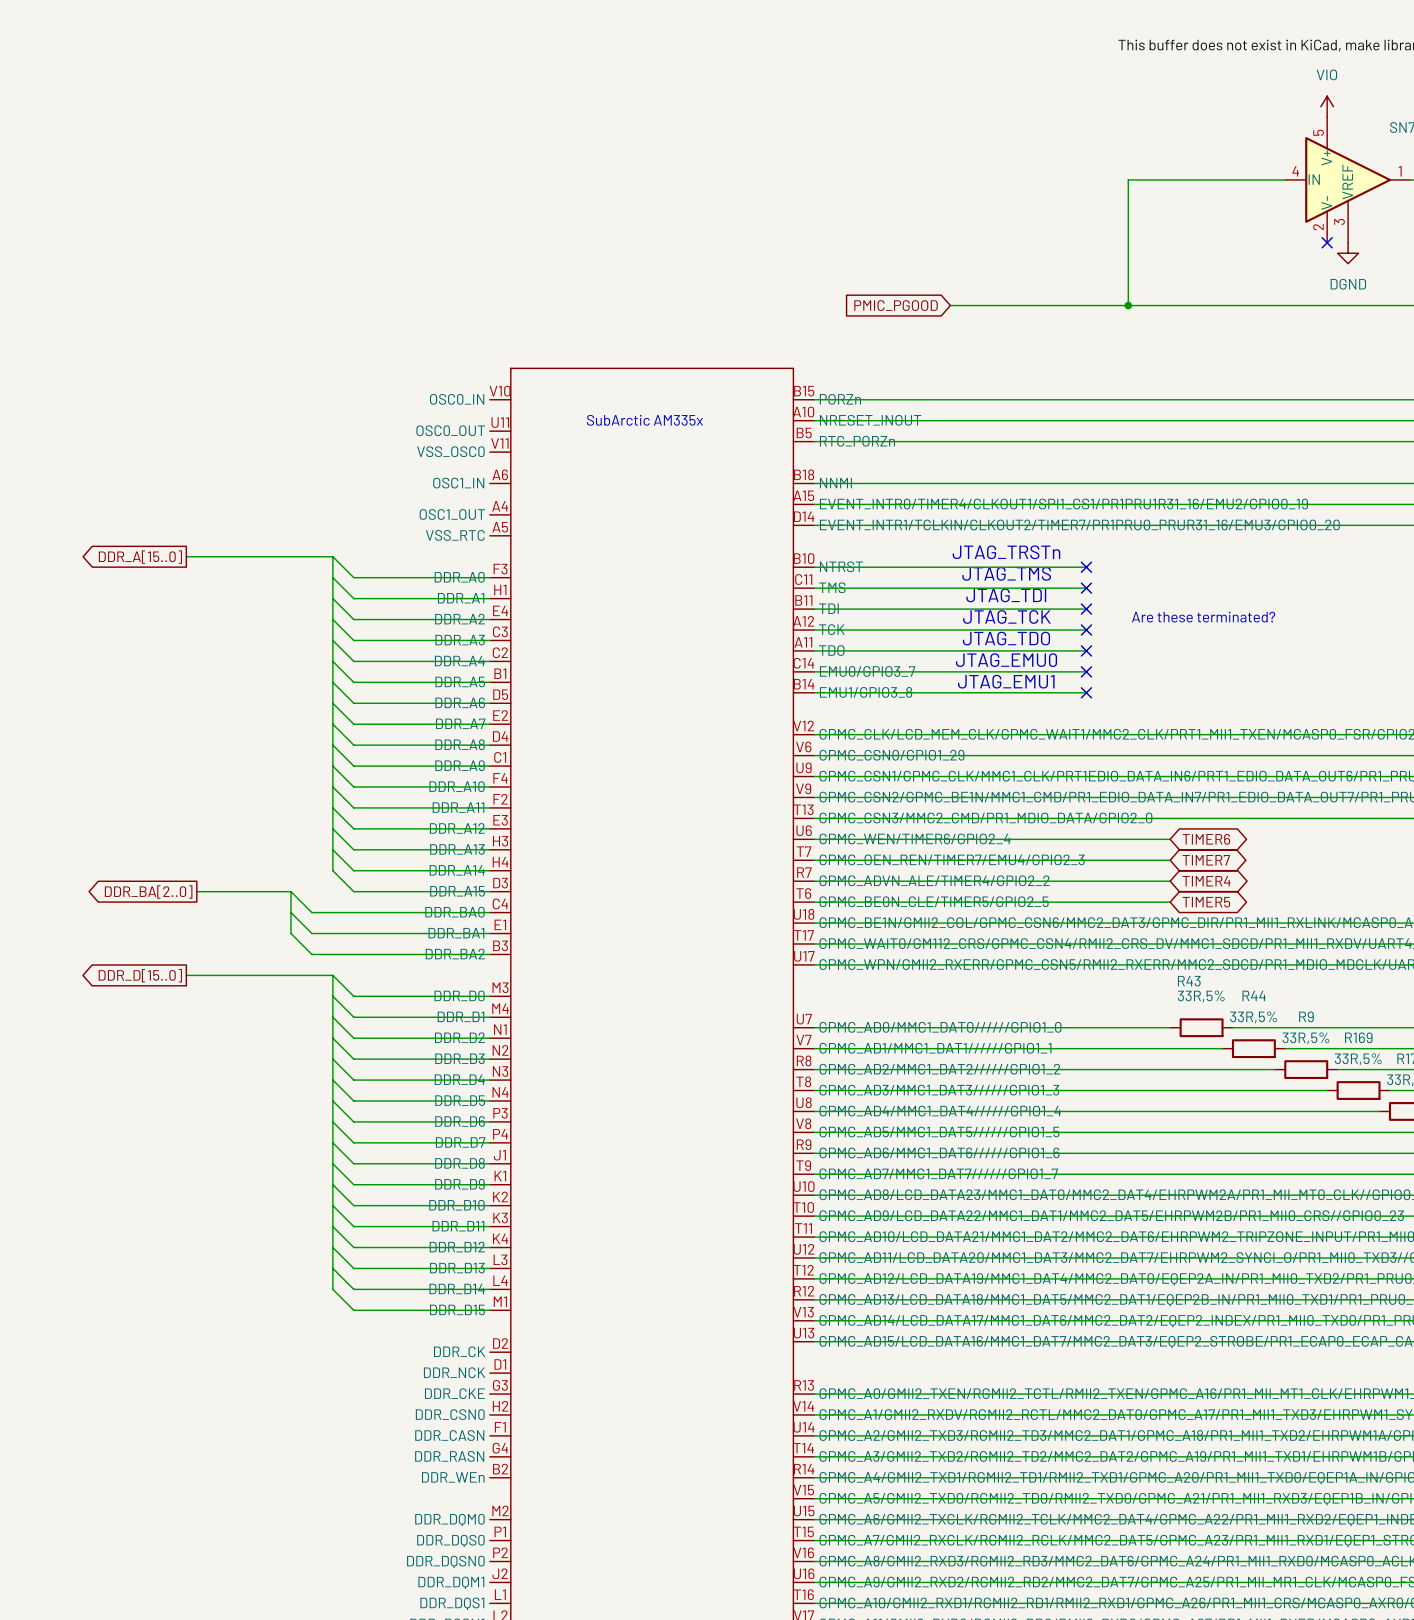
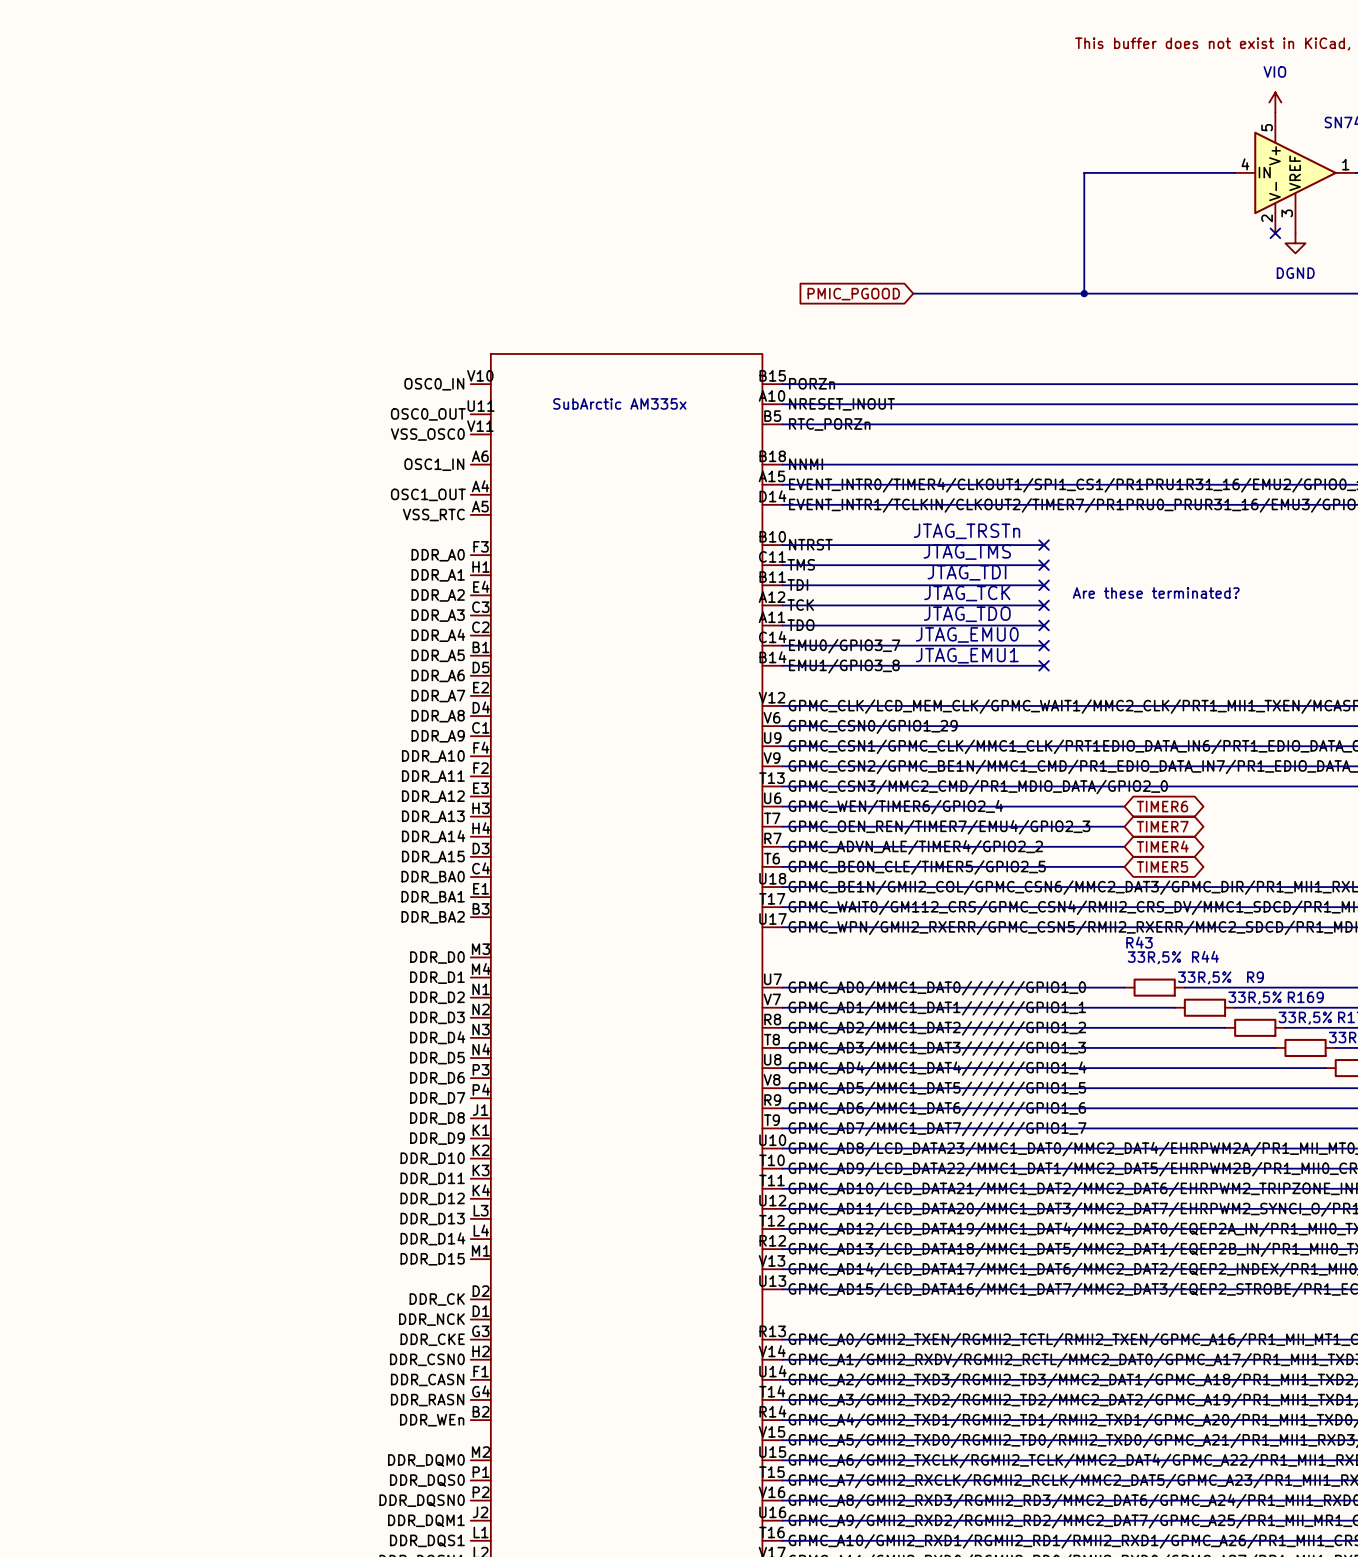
wire: (186, 556) (332, 556) -> none
wire: (332, 556) (353, 577) (489, 577) -> none
wire: (332, 556) (332, 870) (353, 891) (489, 891) -> none
global label: DDR_A[15..0] (140, 557) -> none
wire: (332, 577) (353, 598) (489, 598) -> none
wire: (332, 598) (353, 619) (489, 619) -> none
wire: (332, 619) (353, 640) (489, 640) -> none
wire: (332, 640) (353, 661) (489, 661) -> none
wire: (332, 661) (353, 682) (489, 682) -> none
wire: (332, 682) (353, 703) (489, 703) -> none
wire: (332, 703) (353, 724) (489, 724) -> none
wire: (332, 724) (353, 745) (489, 745) -> none
wire: (332, 745) (353, 766) (489, 766) -> none
wire: (332, 766) (353, 787) (489, 787) -> none
wire: (332, 787) (353, 807) (489, 807) -> none
wire: (332, 807) (353, 828) (489, 828) -> none
wire: (332, 828) (353, 849) (489, 849) -> none
wire: (332, 849) (353, 870) (489, 870) -> none
wire: (196, 891) (291, 891) -> none
wire: (291, 891) (311, 912) (489, 912) -> none
wire: (291, 891) (291, 933) (311, 954) (489, 954) -> none
global label: DDR_BA[2..0] (148, 892) -> none
wire: (291, 912) (311, 933) (489, 933) -> none
global label: DDR_D[15..0] (140, 975) -> none
wire: (186, 975) (332, 975) -> none
wire: (332, 975) (353, 996) (489, 996) -> none
wire: (332, 975) (332, 1289) (353, 1310) (489, 1310) -> none
wire: (332, 996) (353, 1017) (489, 1017) -> none
wire: (332, 1017) (353, 1038) (489, 1038) -> none
wire: (332, 1038) (353, 1059) (489, 1059) -> none
wire: (332, 1059) (353, 1080) (489, 1080) -> none
wire: (332, 1080) (353, 1100) (489, 1100) -> none
wire: (332, 1100) (353, 1121) (489, 1121) -> none
wire: (332, 1121) (353, 1142) (489, 1142) -> none
wire: (332, 1142) (353, 1163) (489, 1163) -> none
wire: (332, 1163) (353, 1184) (489, 1184) -> none
wire: (332, 1184) (353, 1205) (489, 1205) -> none
wire: (332, 1205) (353, 1226) (489, 1226) -> none
wire: (332, 1226) (353, 1247) (489, 1247) -> none
wire: (332, 1247) (353, 1268) (489, 1268) -> none
wire: (332, 1268) (353, 1289) (489, 1289) -> none

